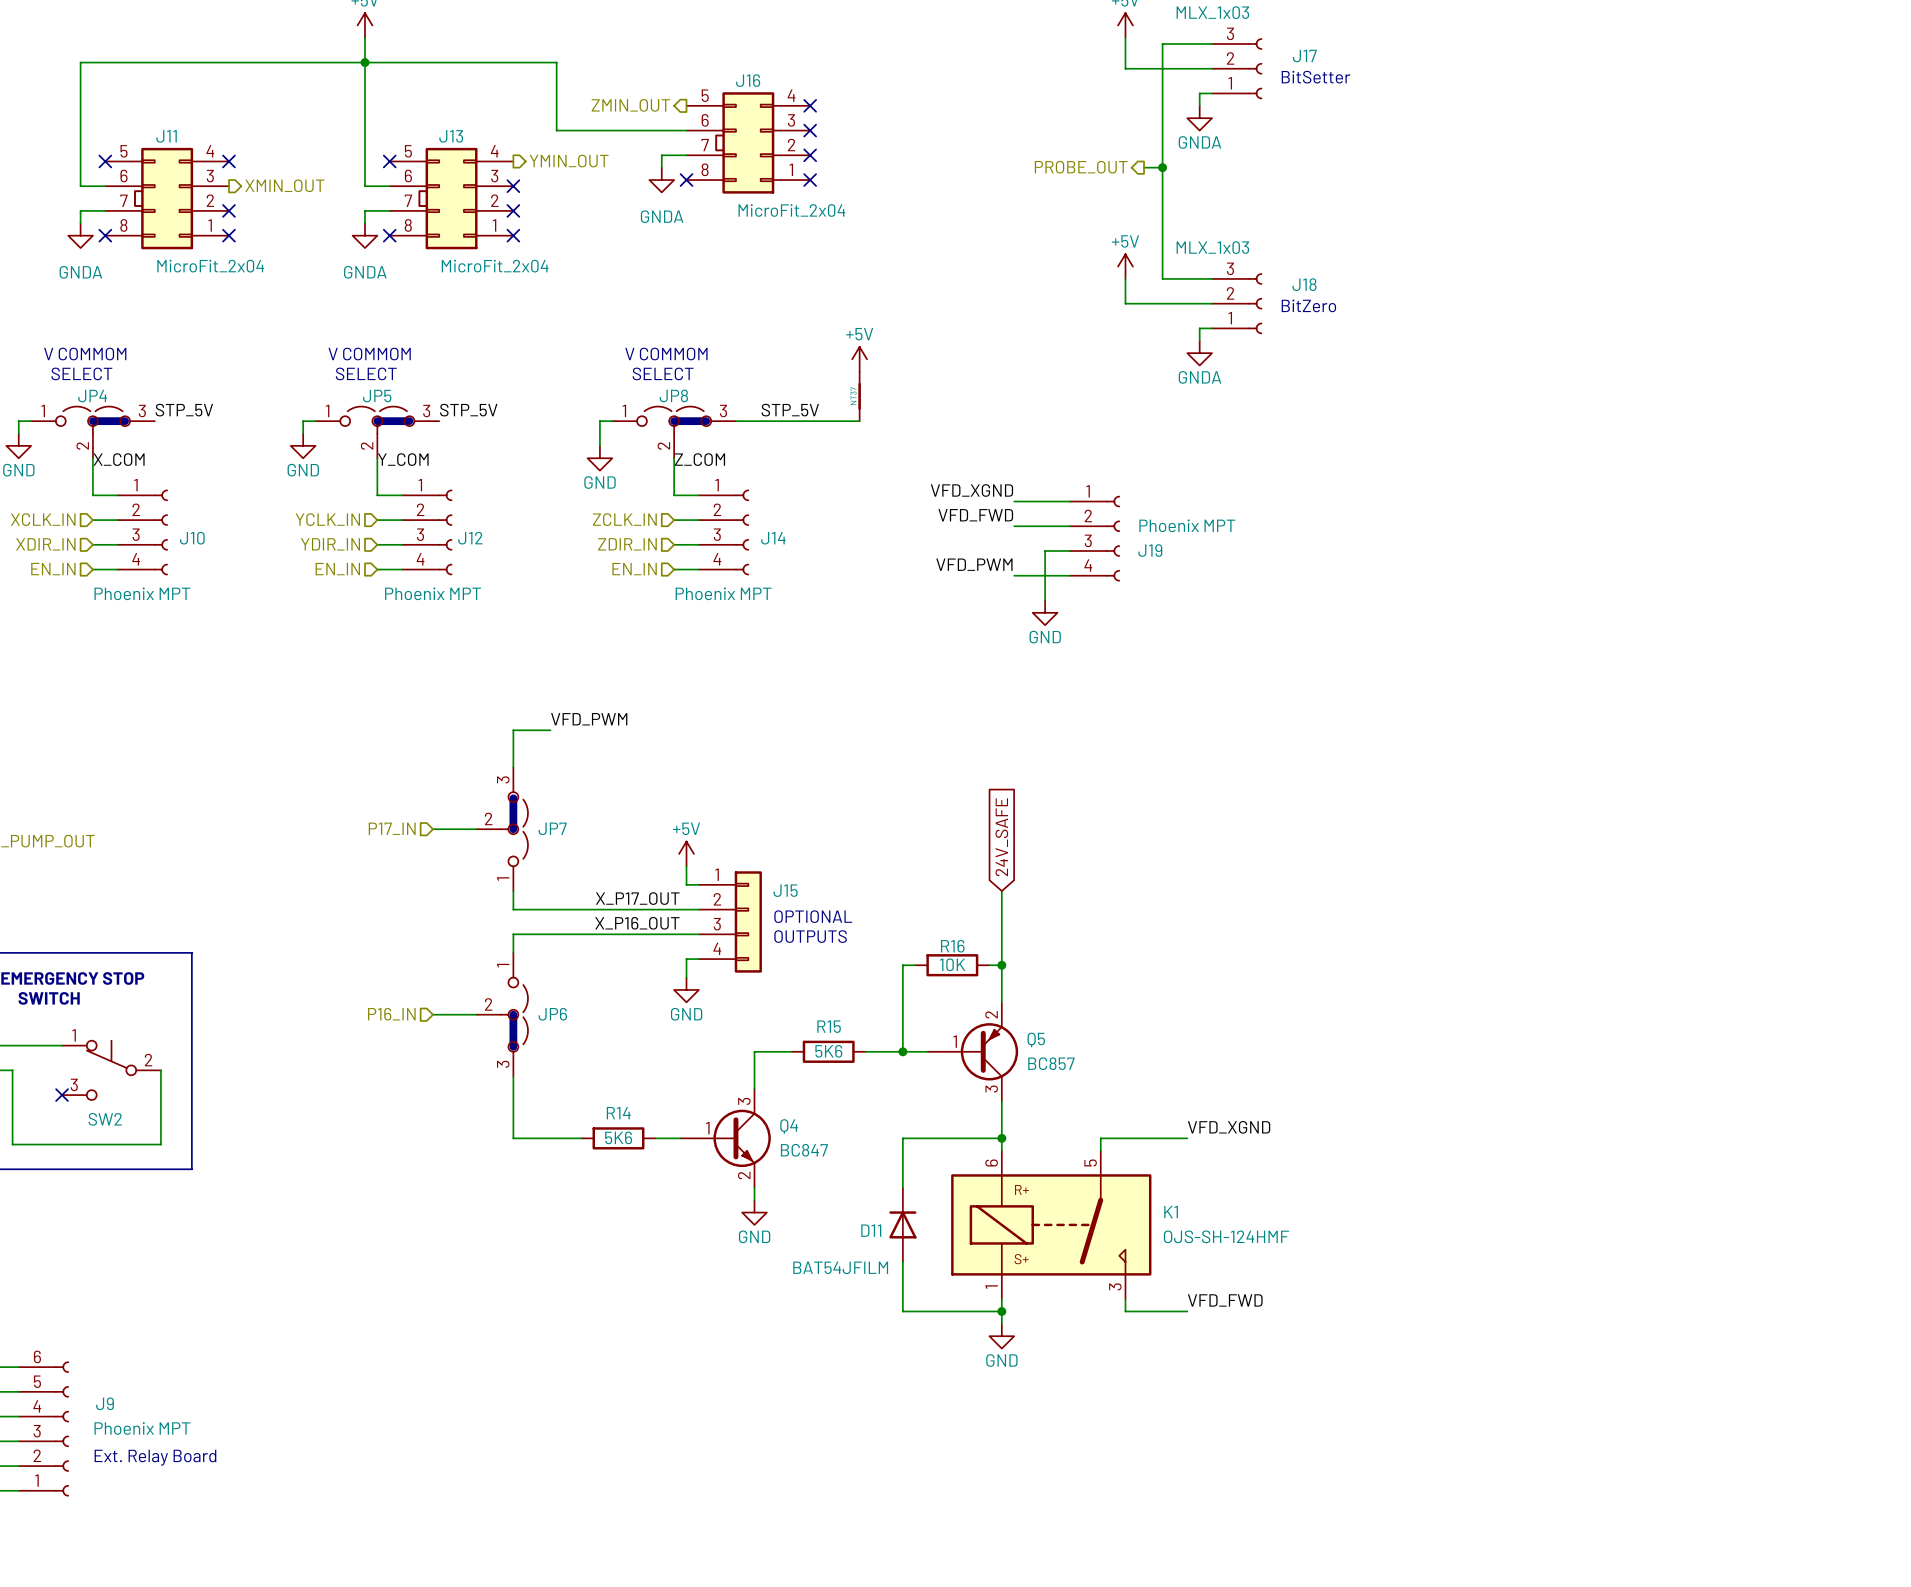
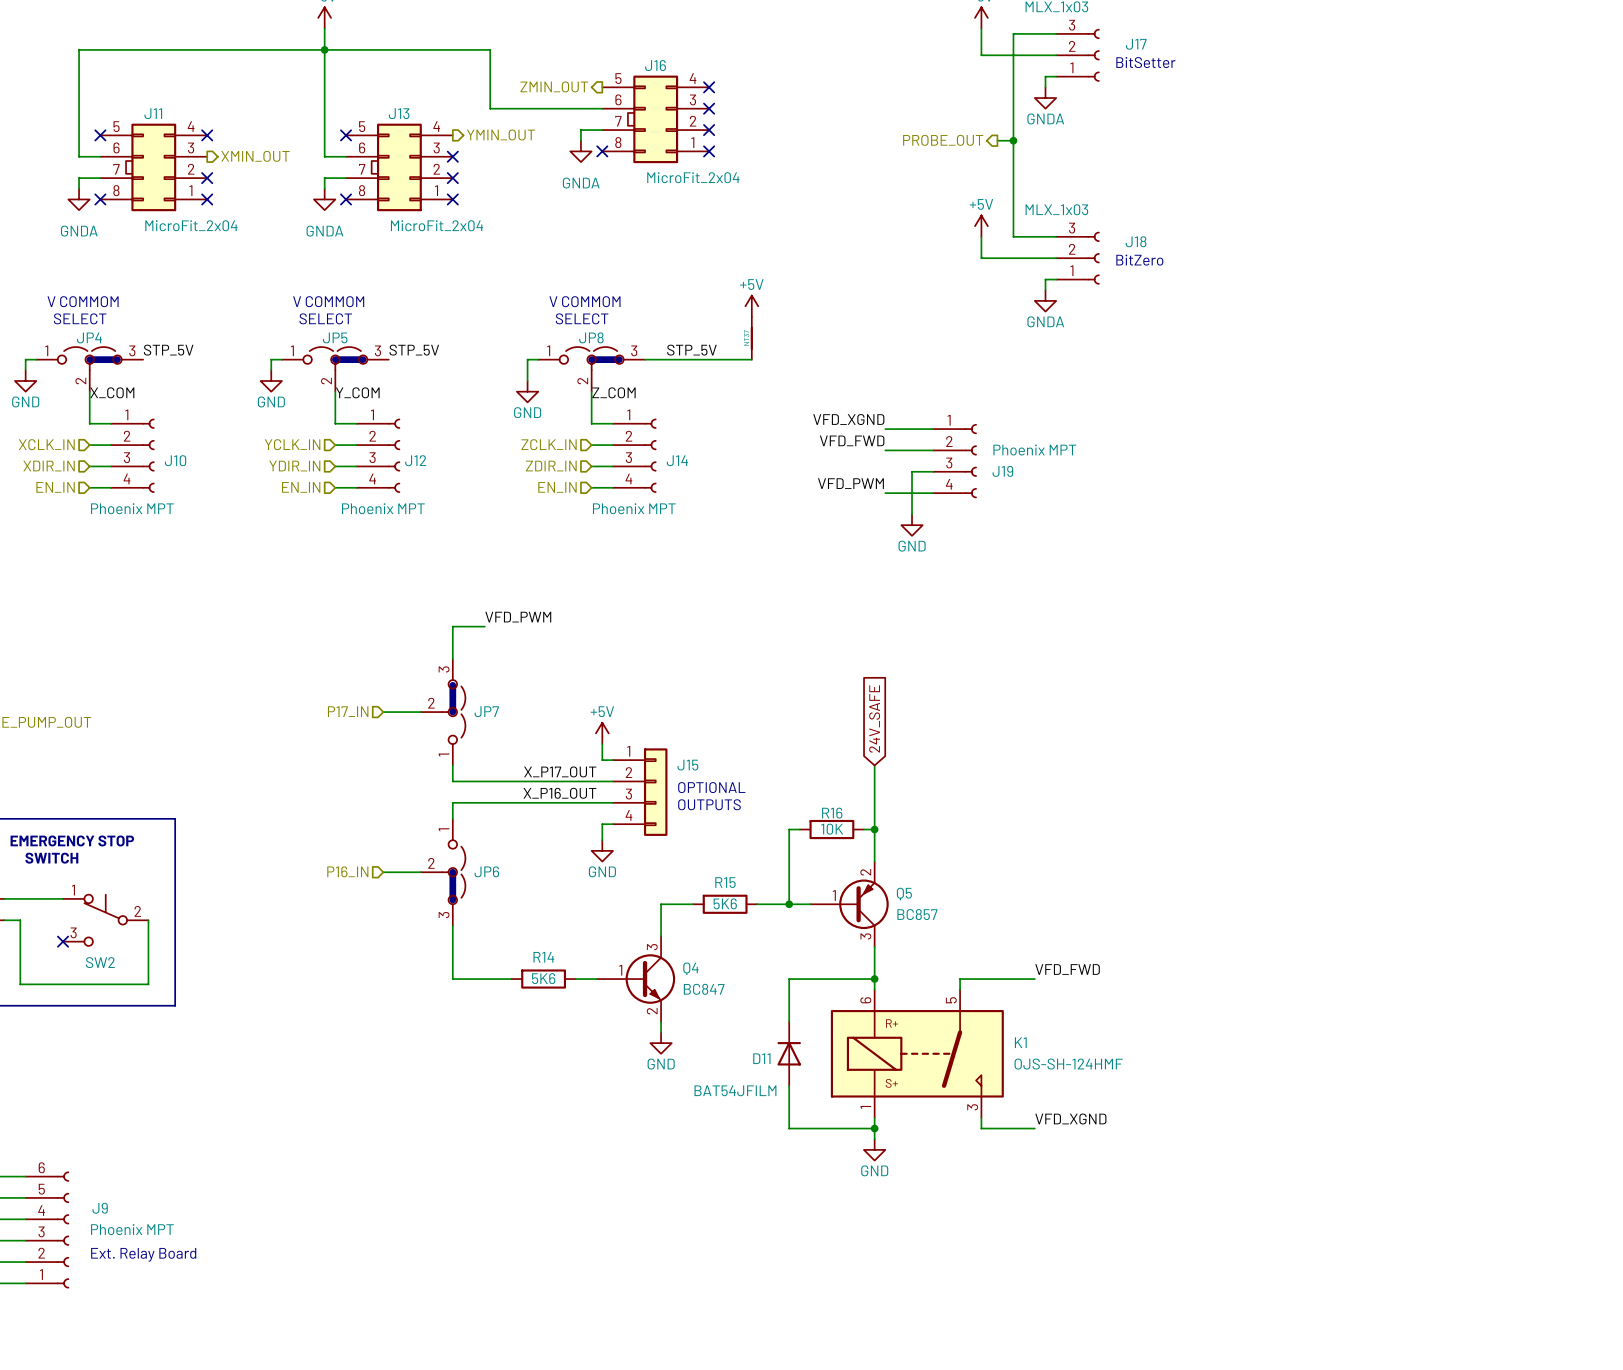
label: VFD_XGND (1229, 1127) -> VFD_FWD (1067, 969)
label: VFD_FWD (1225, 1300) -> VFD_XGND (1070, 1119)

